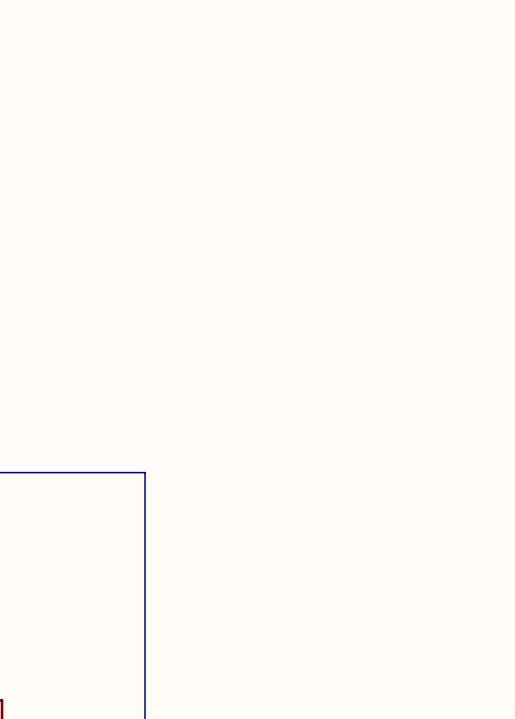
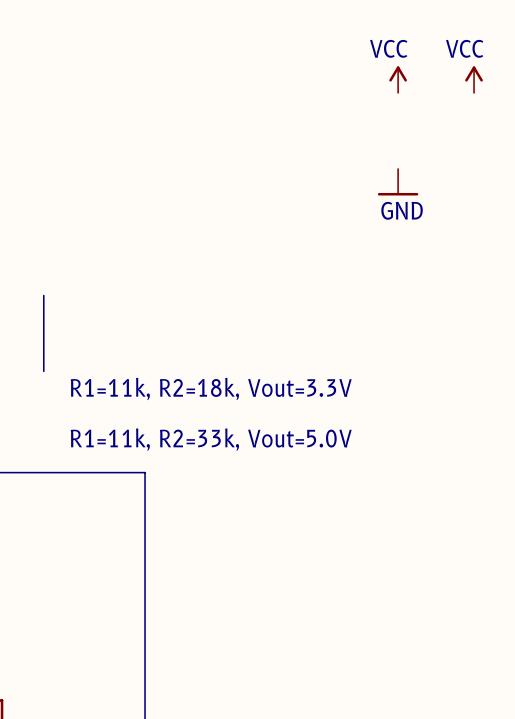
power symbol: none -> VCC (398, 79)
power symbol: none -> VCC (474, 79)
power symbol: none -> GND (398, 182)
wire: none -> (43, 295) (43, 371)
text: none -> R1=11k, R2=18k, Vout=3.3V (211, 389)
text: none -> R1=11k, R2=33k, Vout=5.0V (211, 439)

